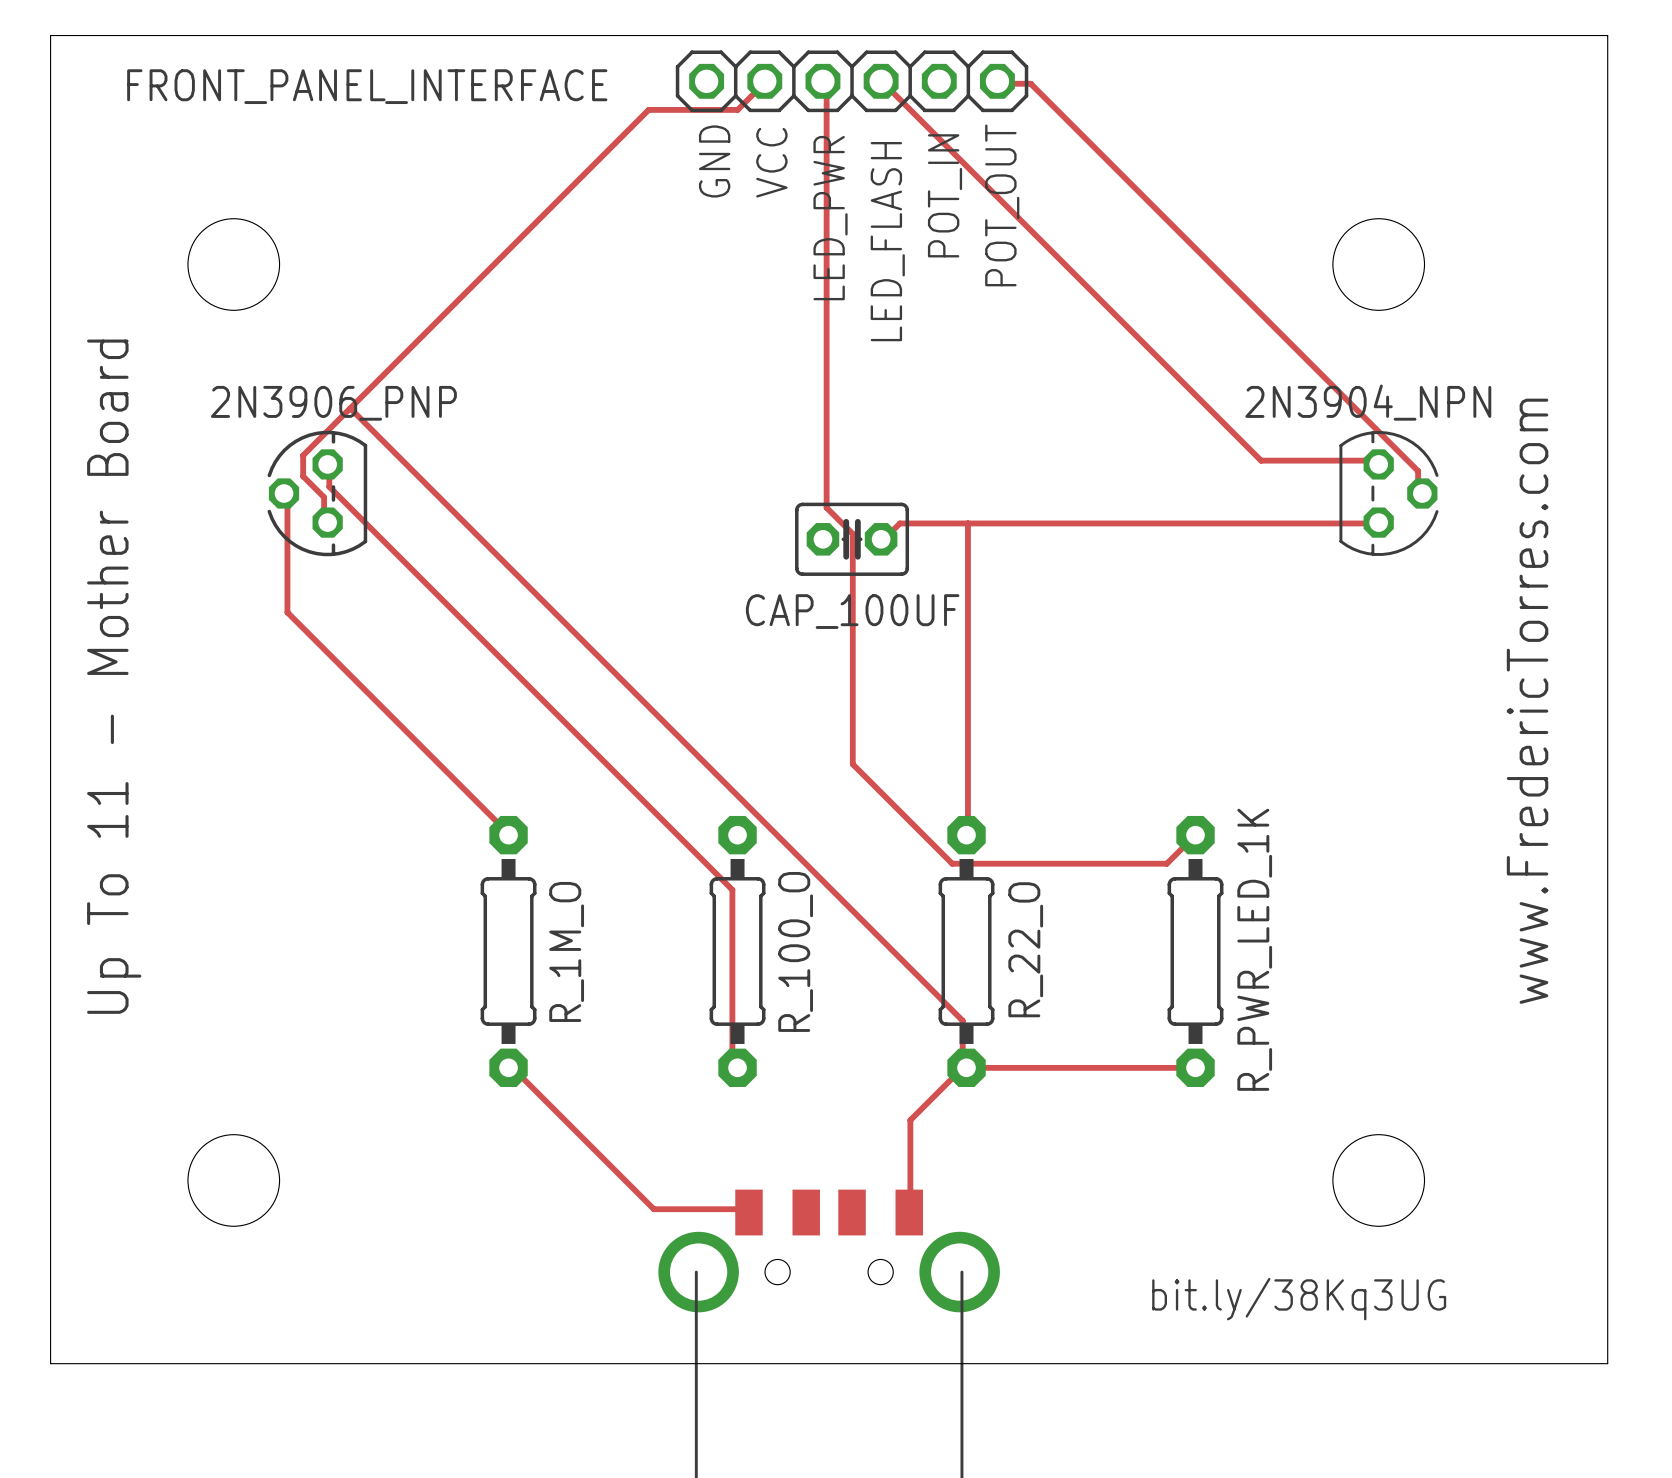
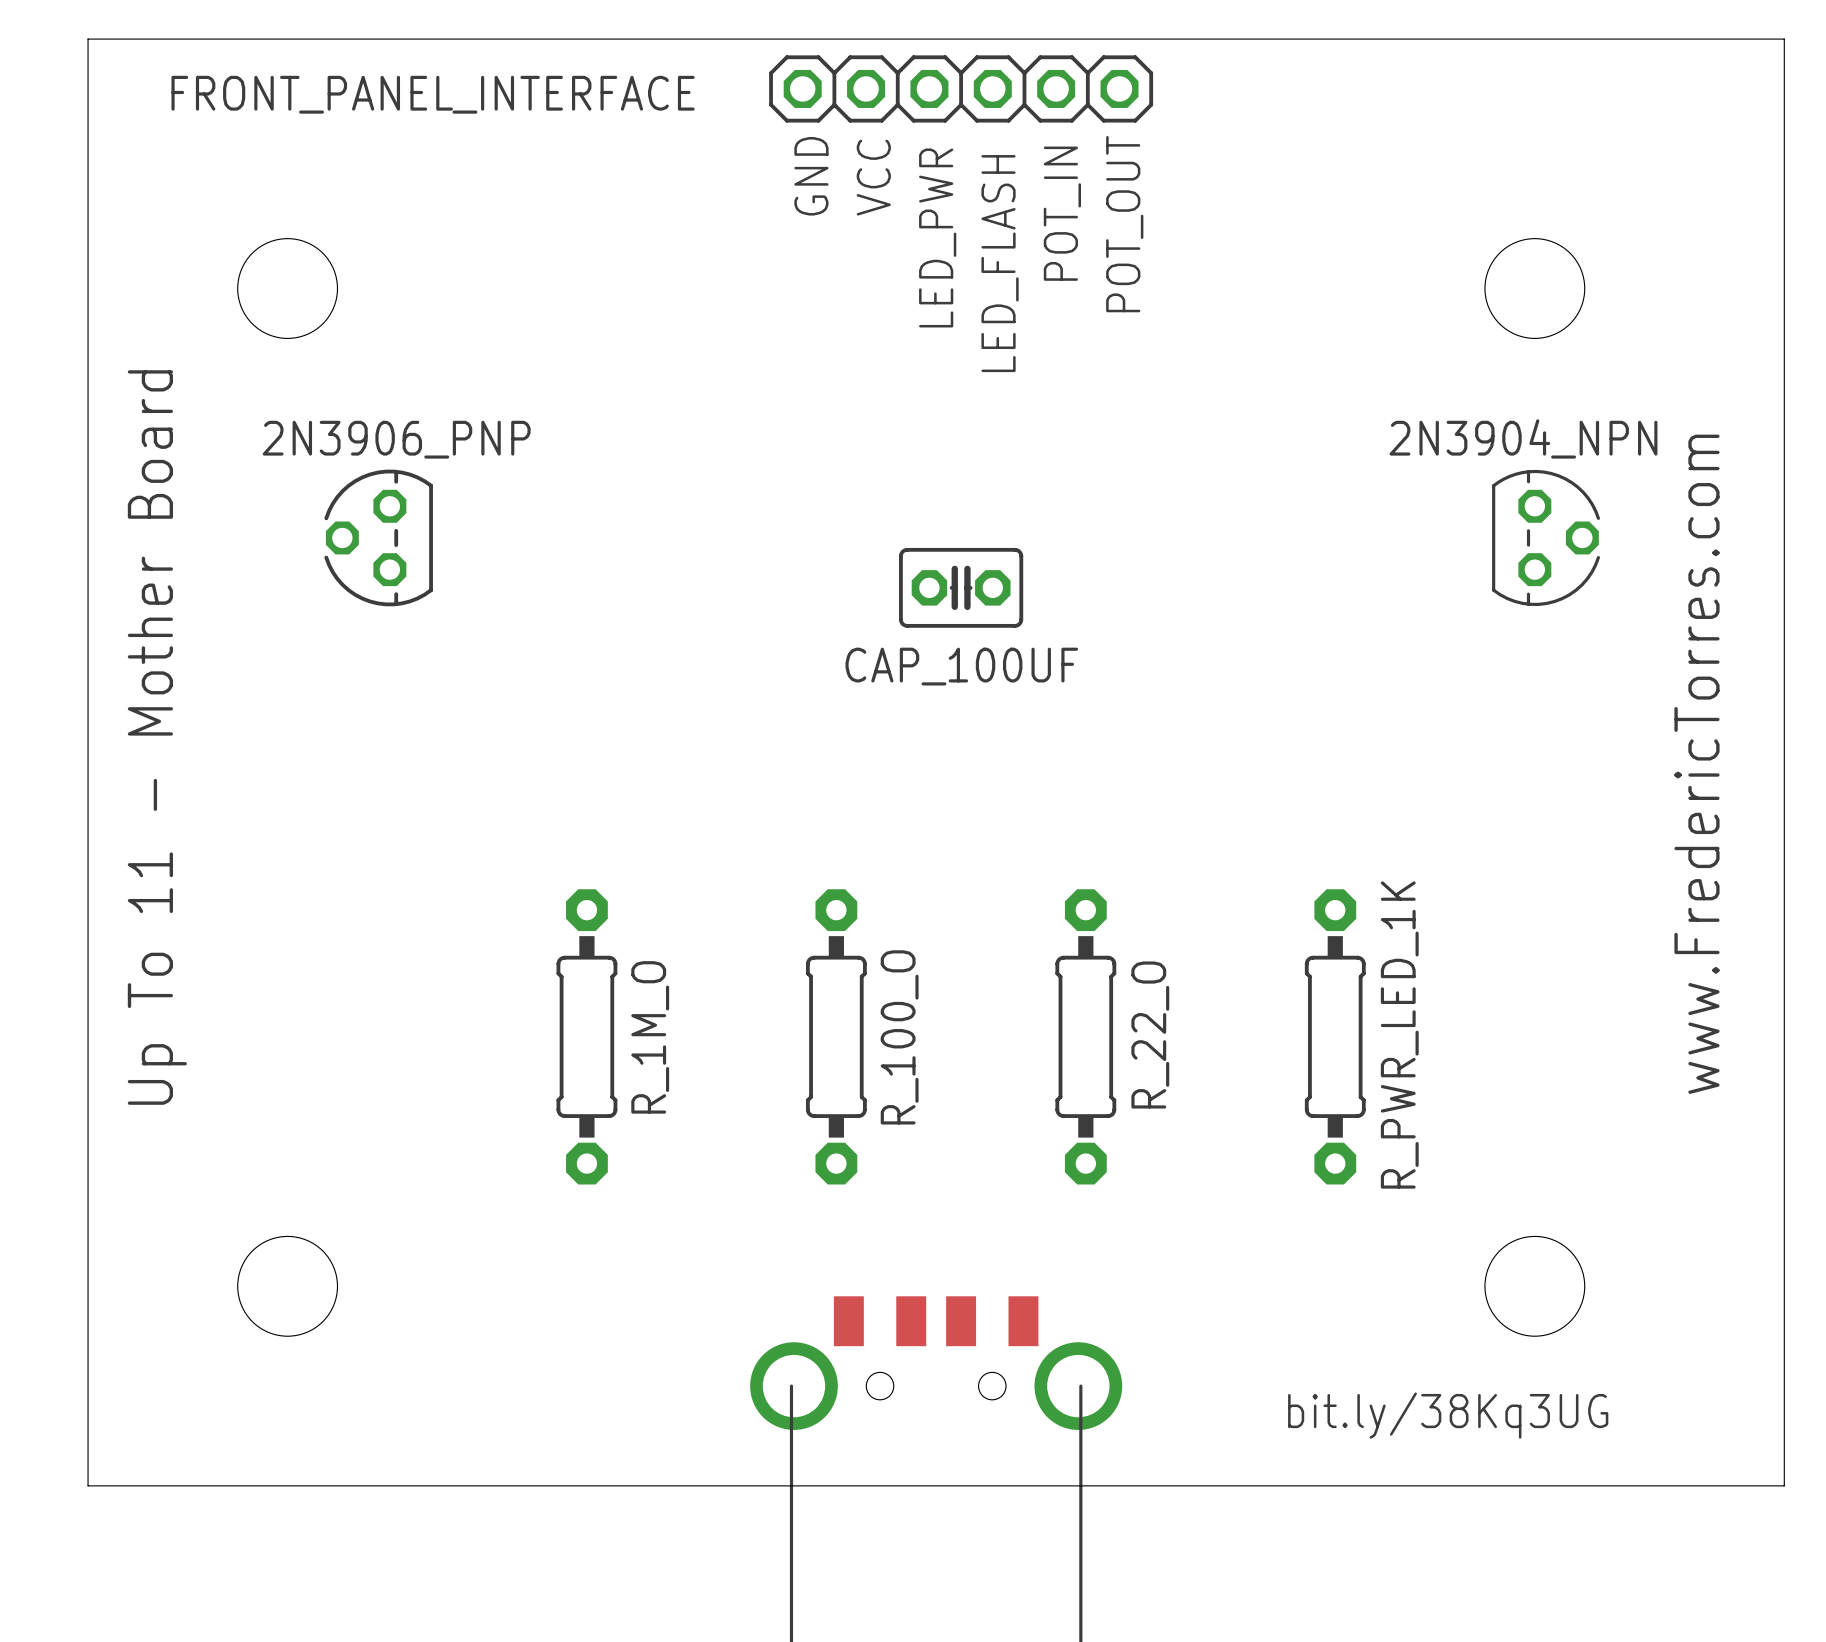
track: (764, 81) (737, 109) (648, 109) (303, 455) (303, 476) (324, 497) (324, 518) (327, 522) -> none
track: (822, 81) (826, 83) (826, 507) (852, 533) (852, 764) (952, 863) (1166, 863) (1195, 835) -> none
track: (881, 81) (1261, 460) (1376, 460) (1378, 464) -> none
track: (997, 81) (999, 83) (1030, 83) (1418, 471) (1418, 492) (1422, 493) -> none
track: (350, 408) (962, 1020) (962, 1062) (966, 1067) -> none
track: (327, 464) (329, 465) (329, 486) (732, 889) (732, 1062) (737, 1067) -> none
track: (284, 493) (287, 497) (287, 612) (508, 835) -> none
track: (1378, 522) (899, 523) (884, 539) (881, 539) -> none
track: (967, 523) (966, 835) -> none
track: (508, 1067) (512, 1067) (653, 1209) (748, 1209) (748, 1212) -> none
track: (966, 1067) (962, 1067) (910, 1120) (909, 1212) -> none
track: (966, 1067) (1195, 1067) -> none

